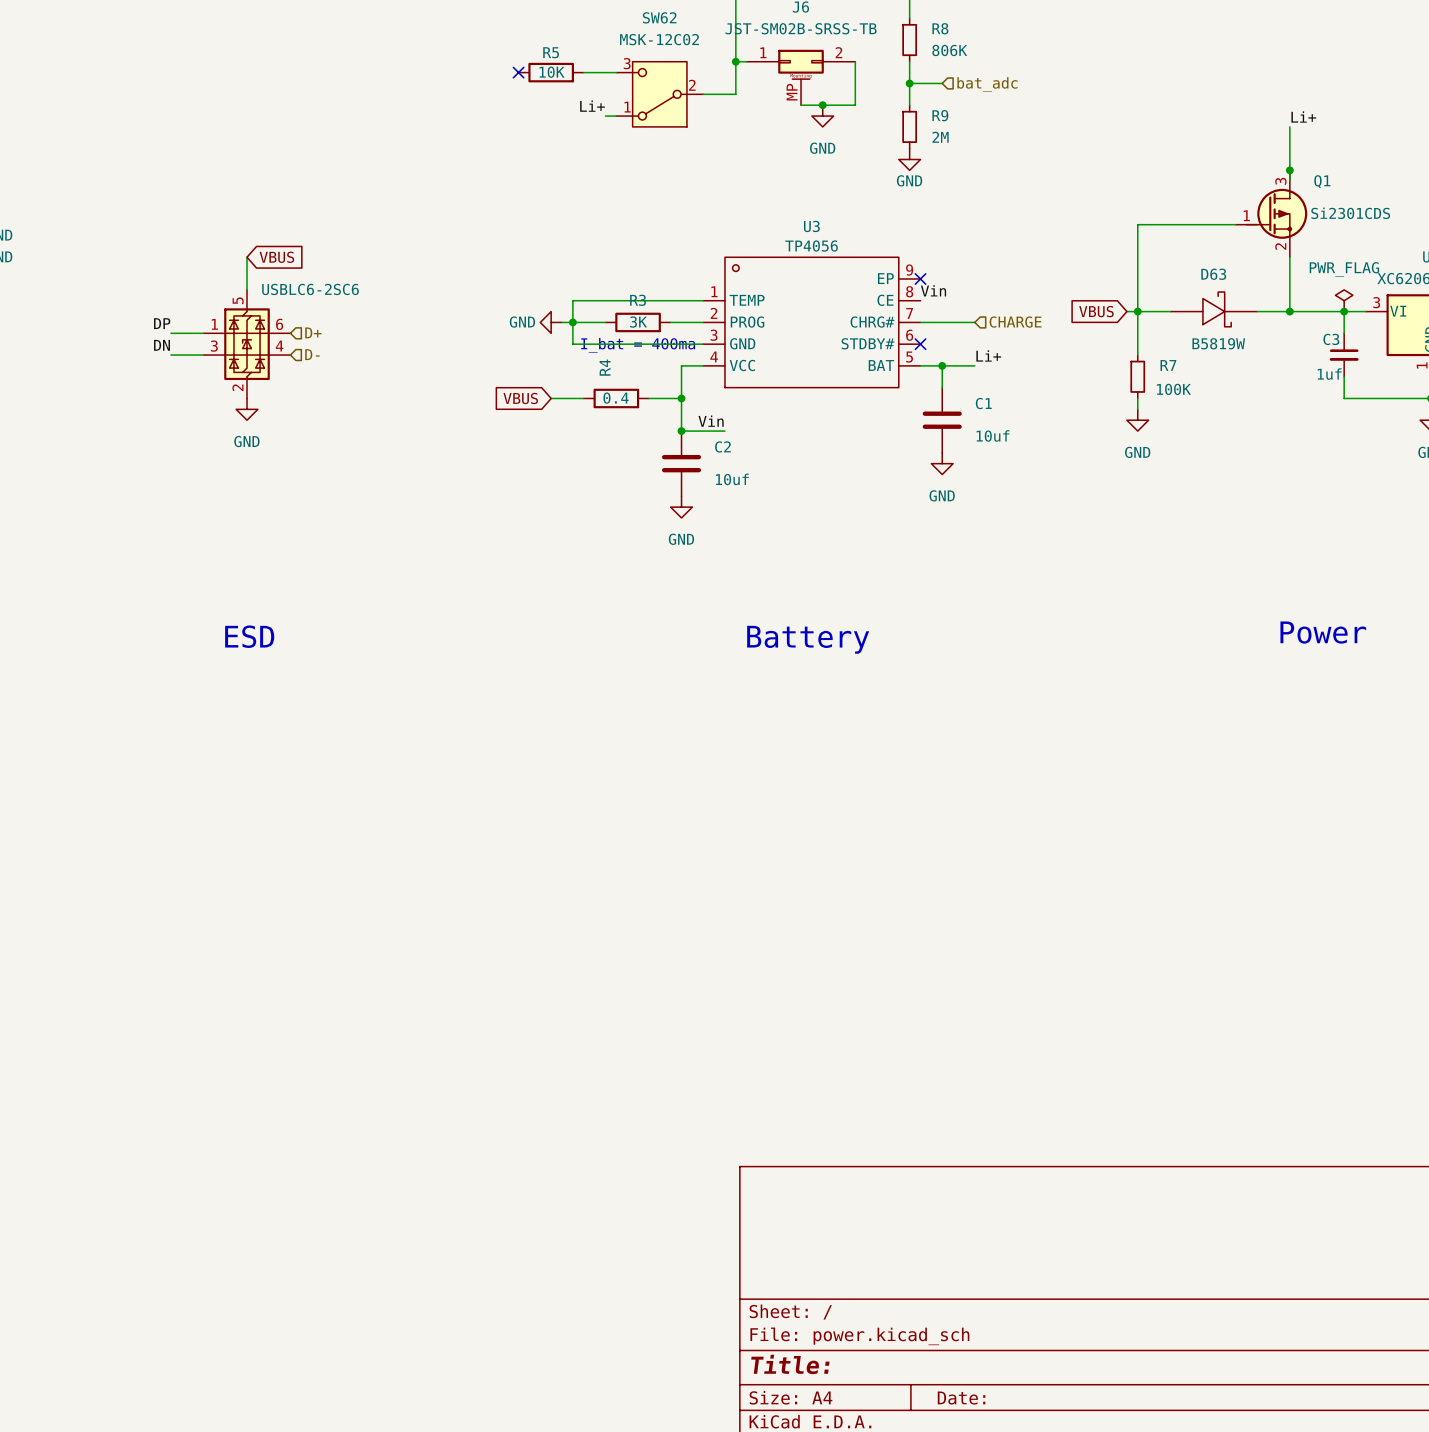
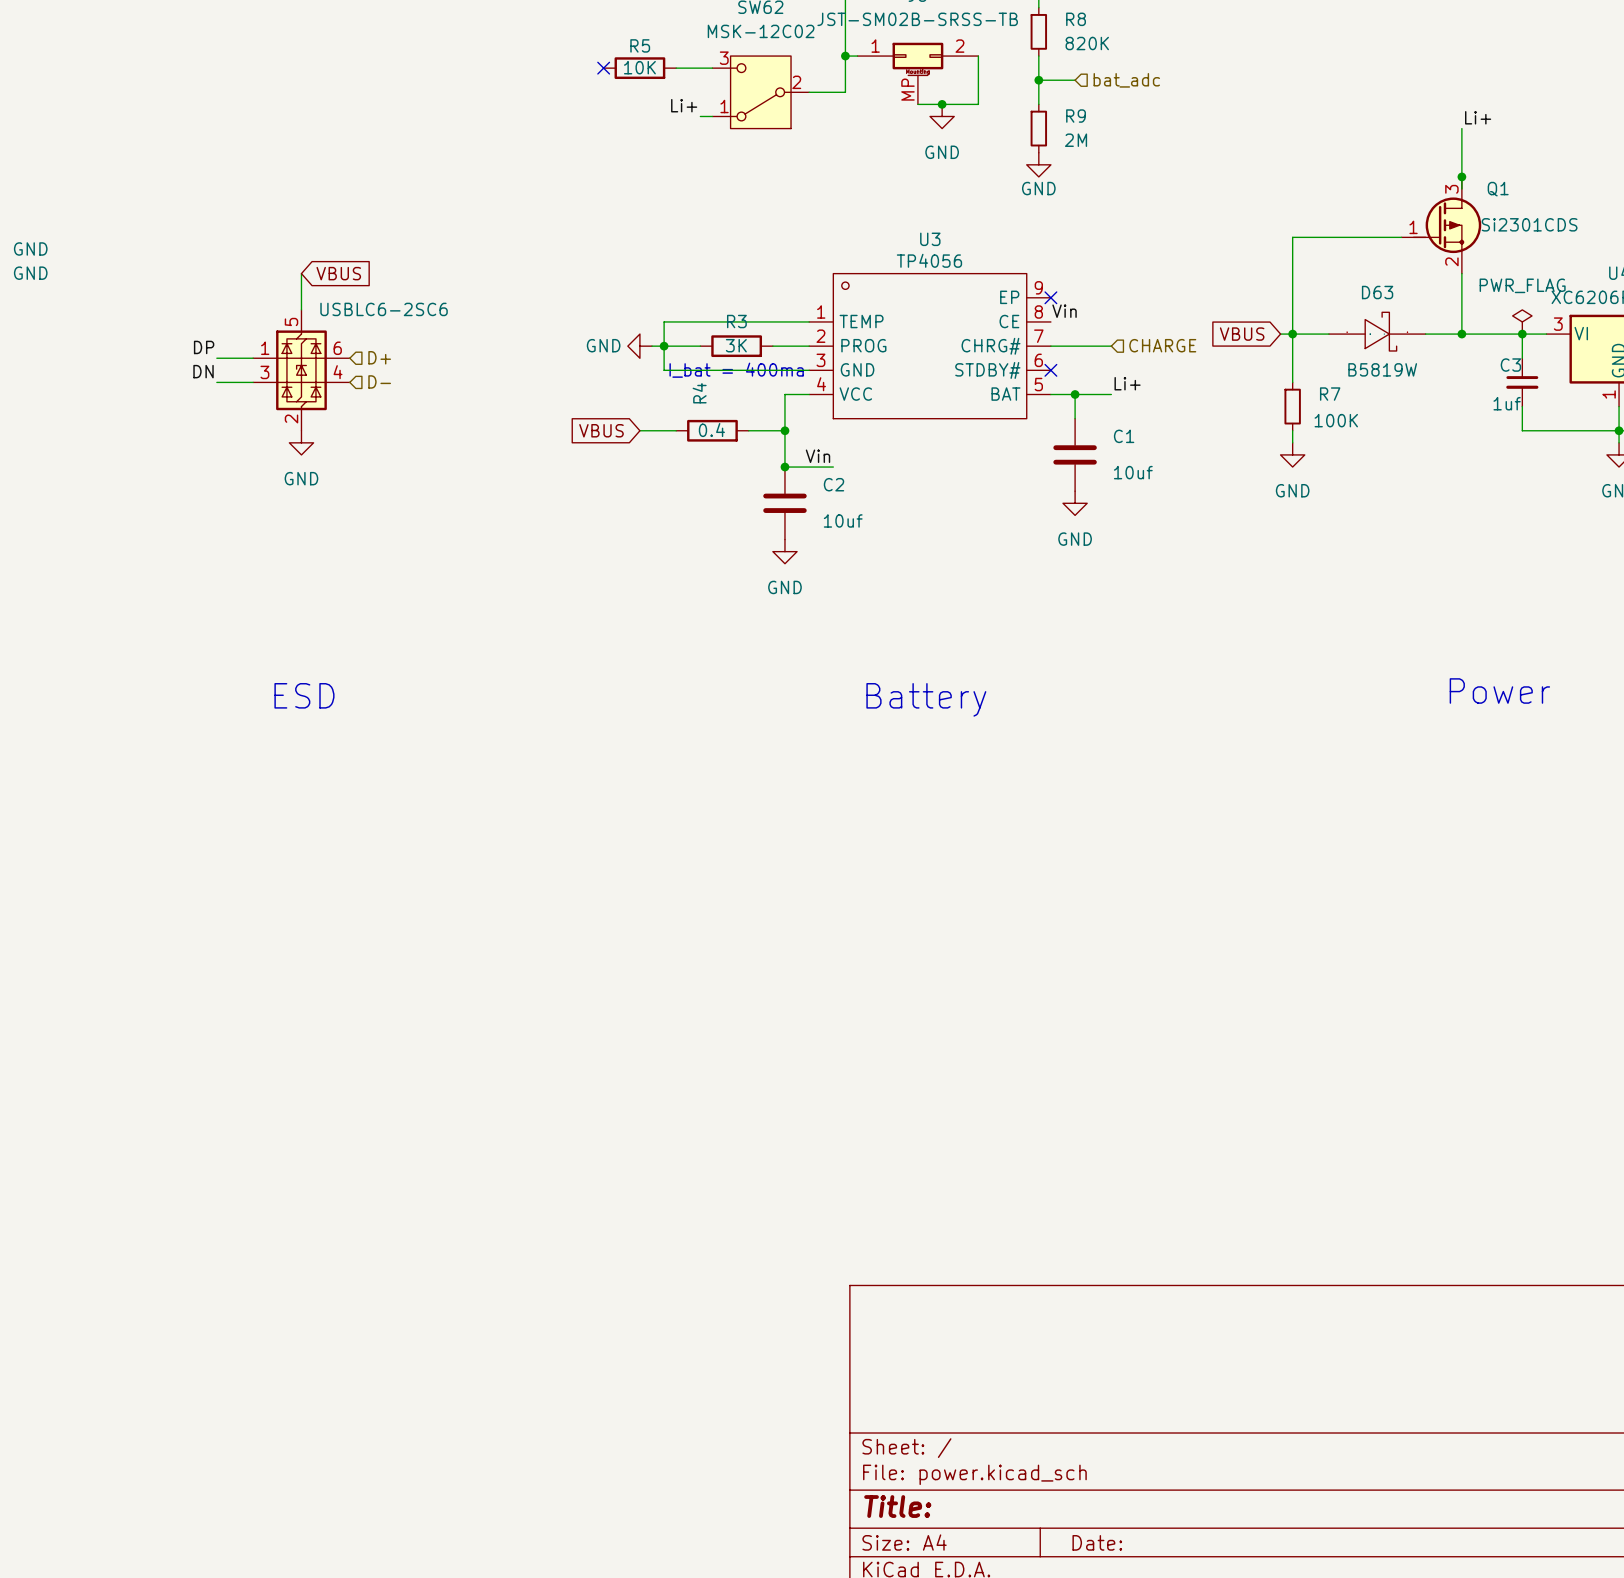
R8 value: 806K (949, 50) -> 820K (1087, 43)

